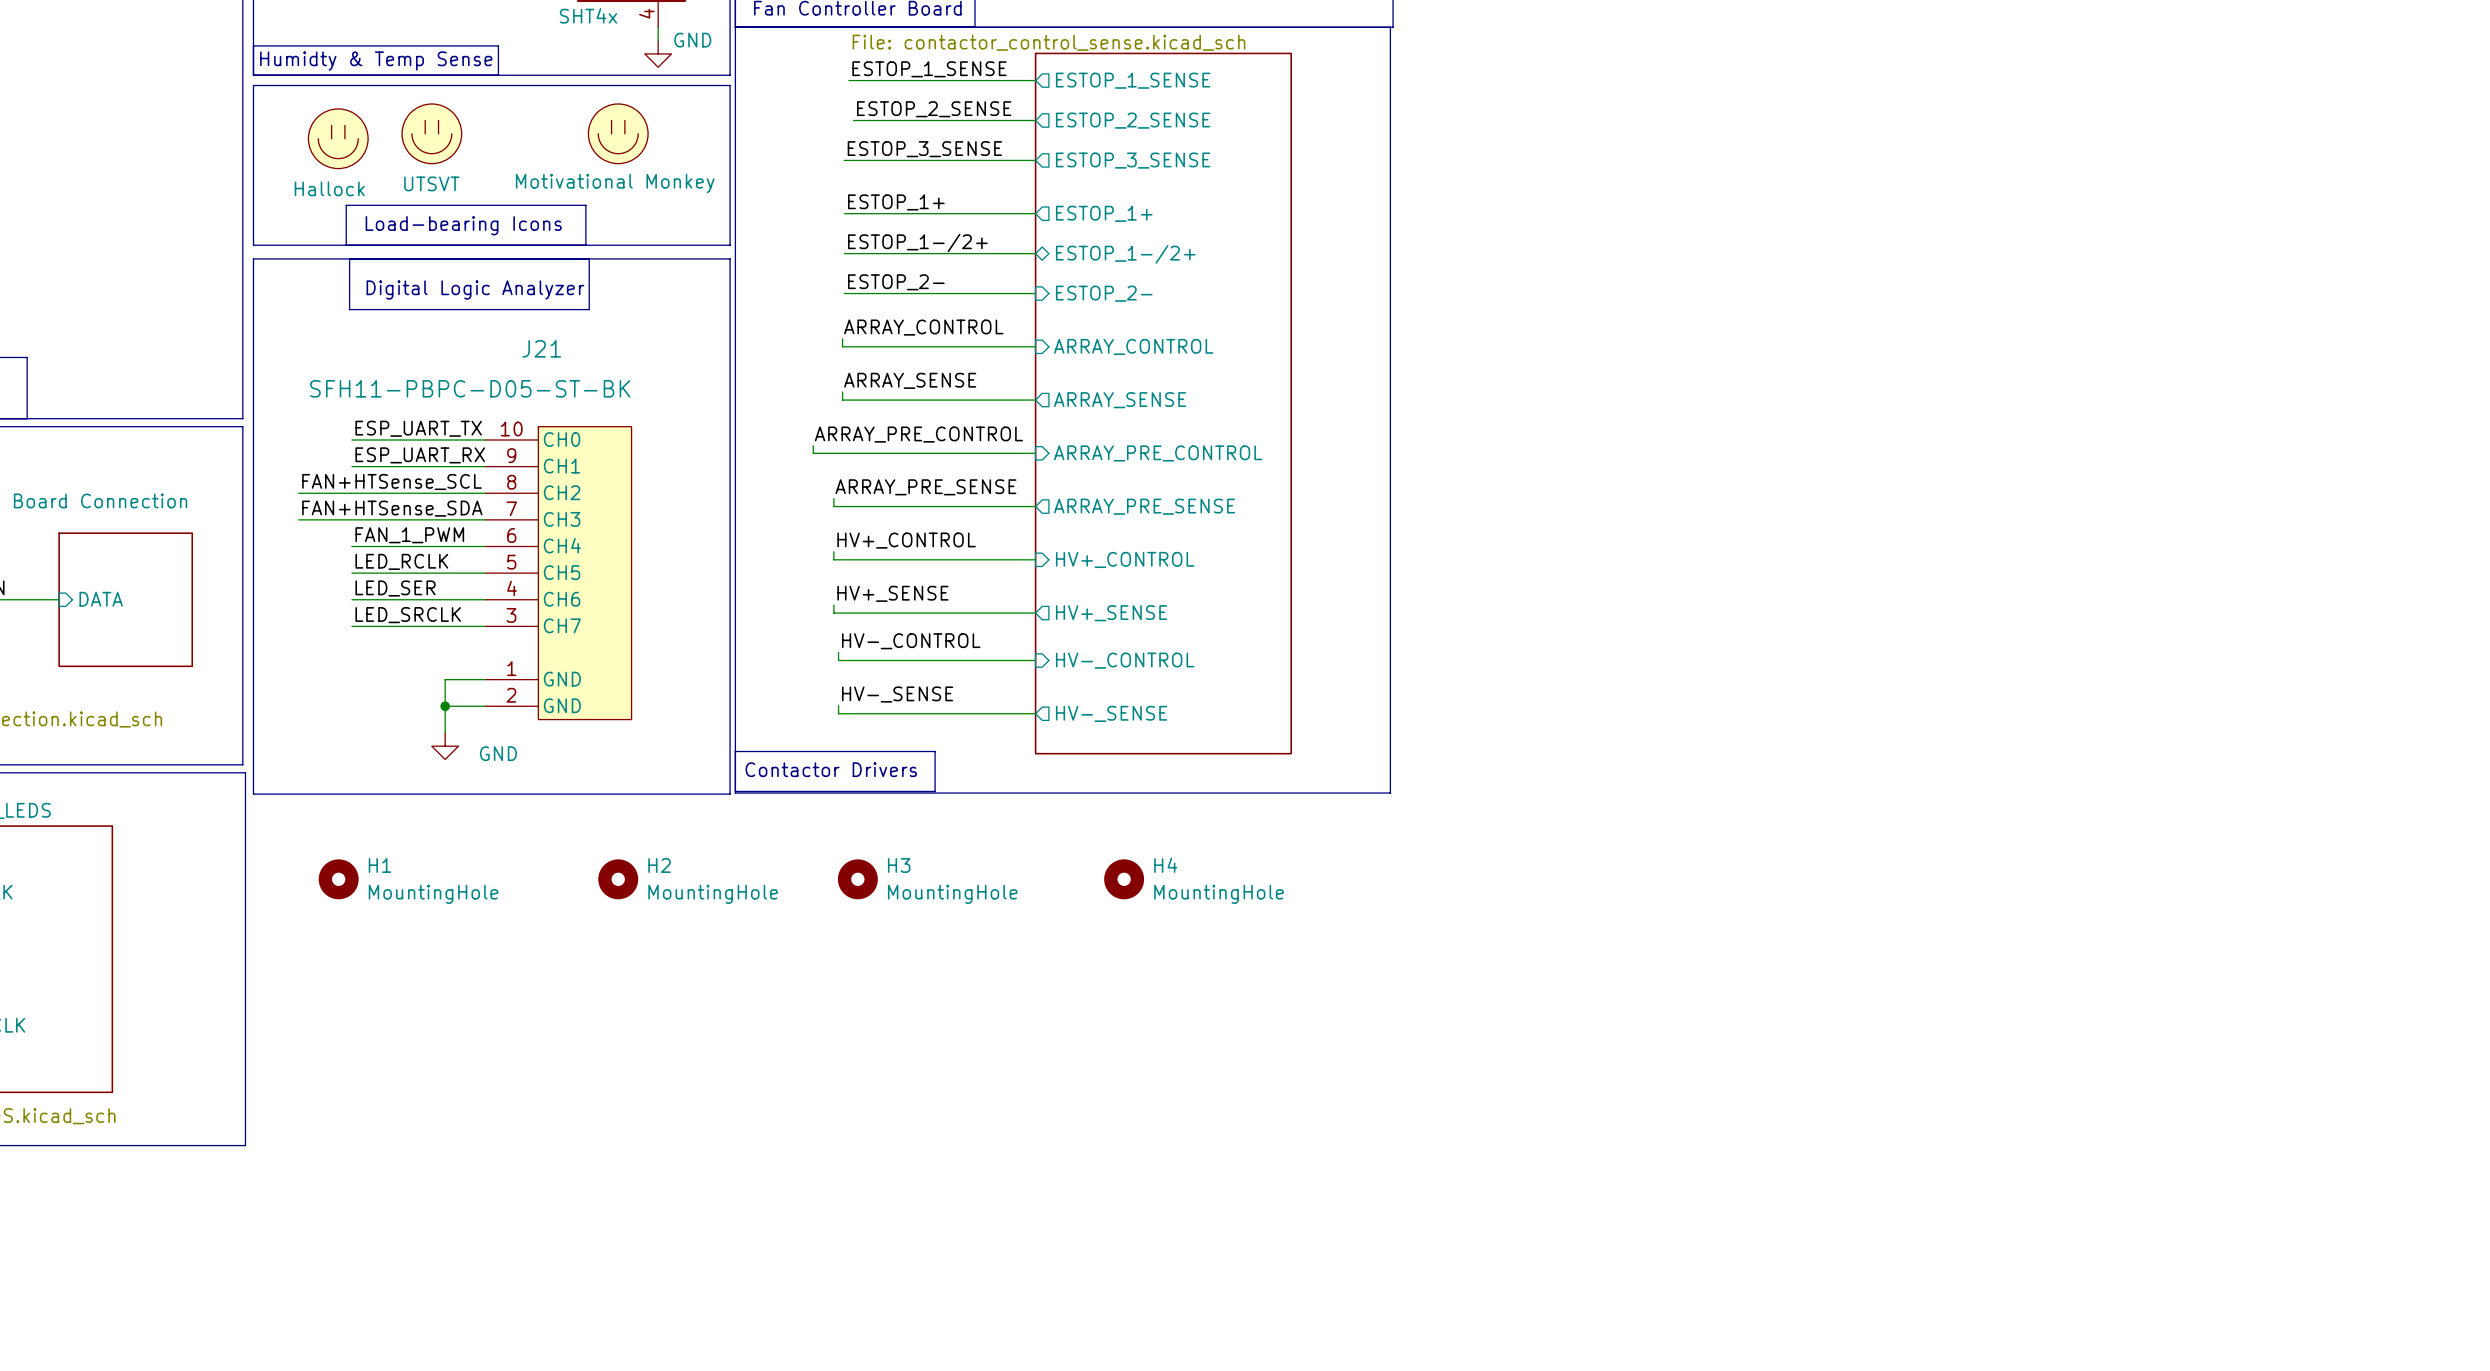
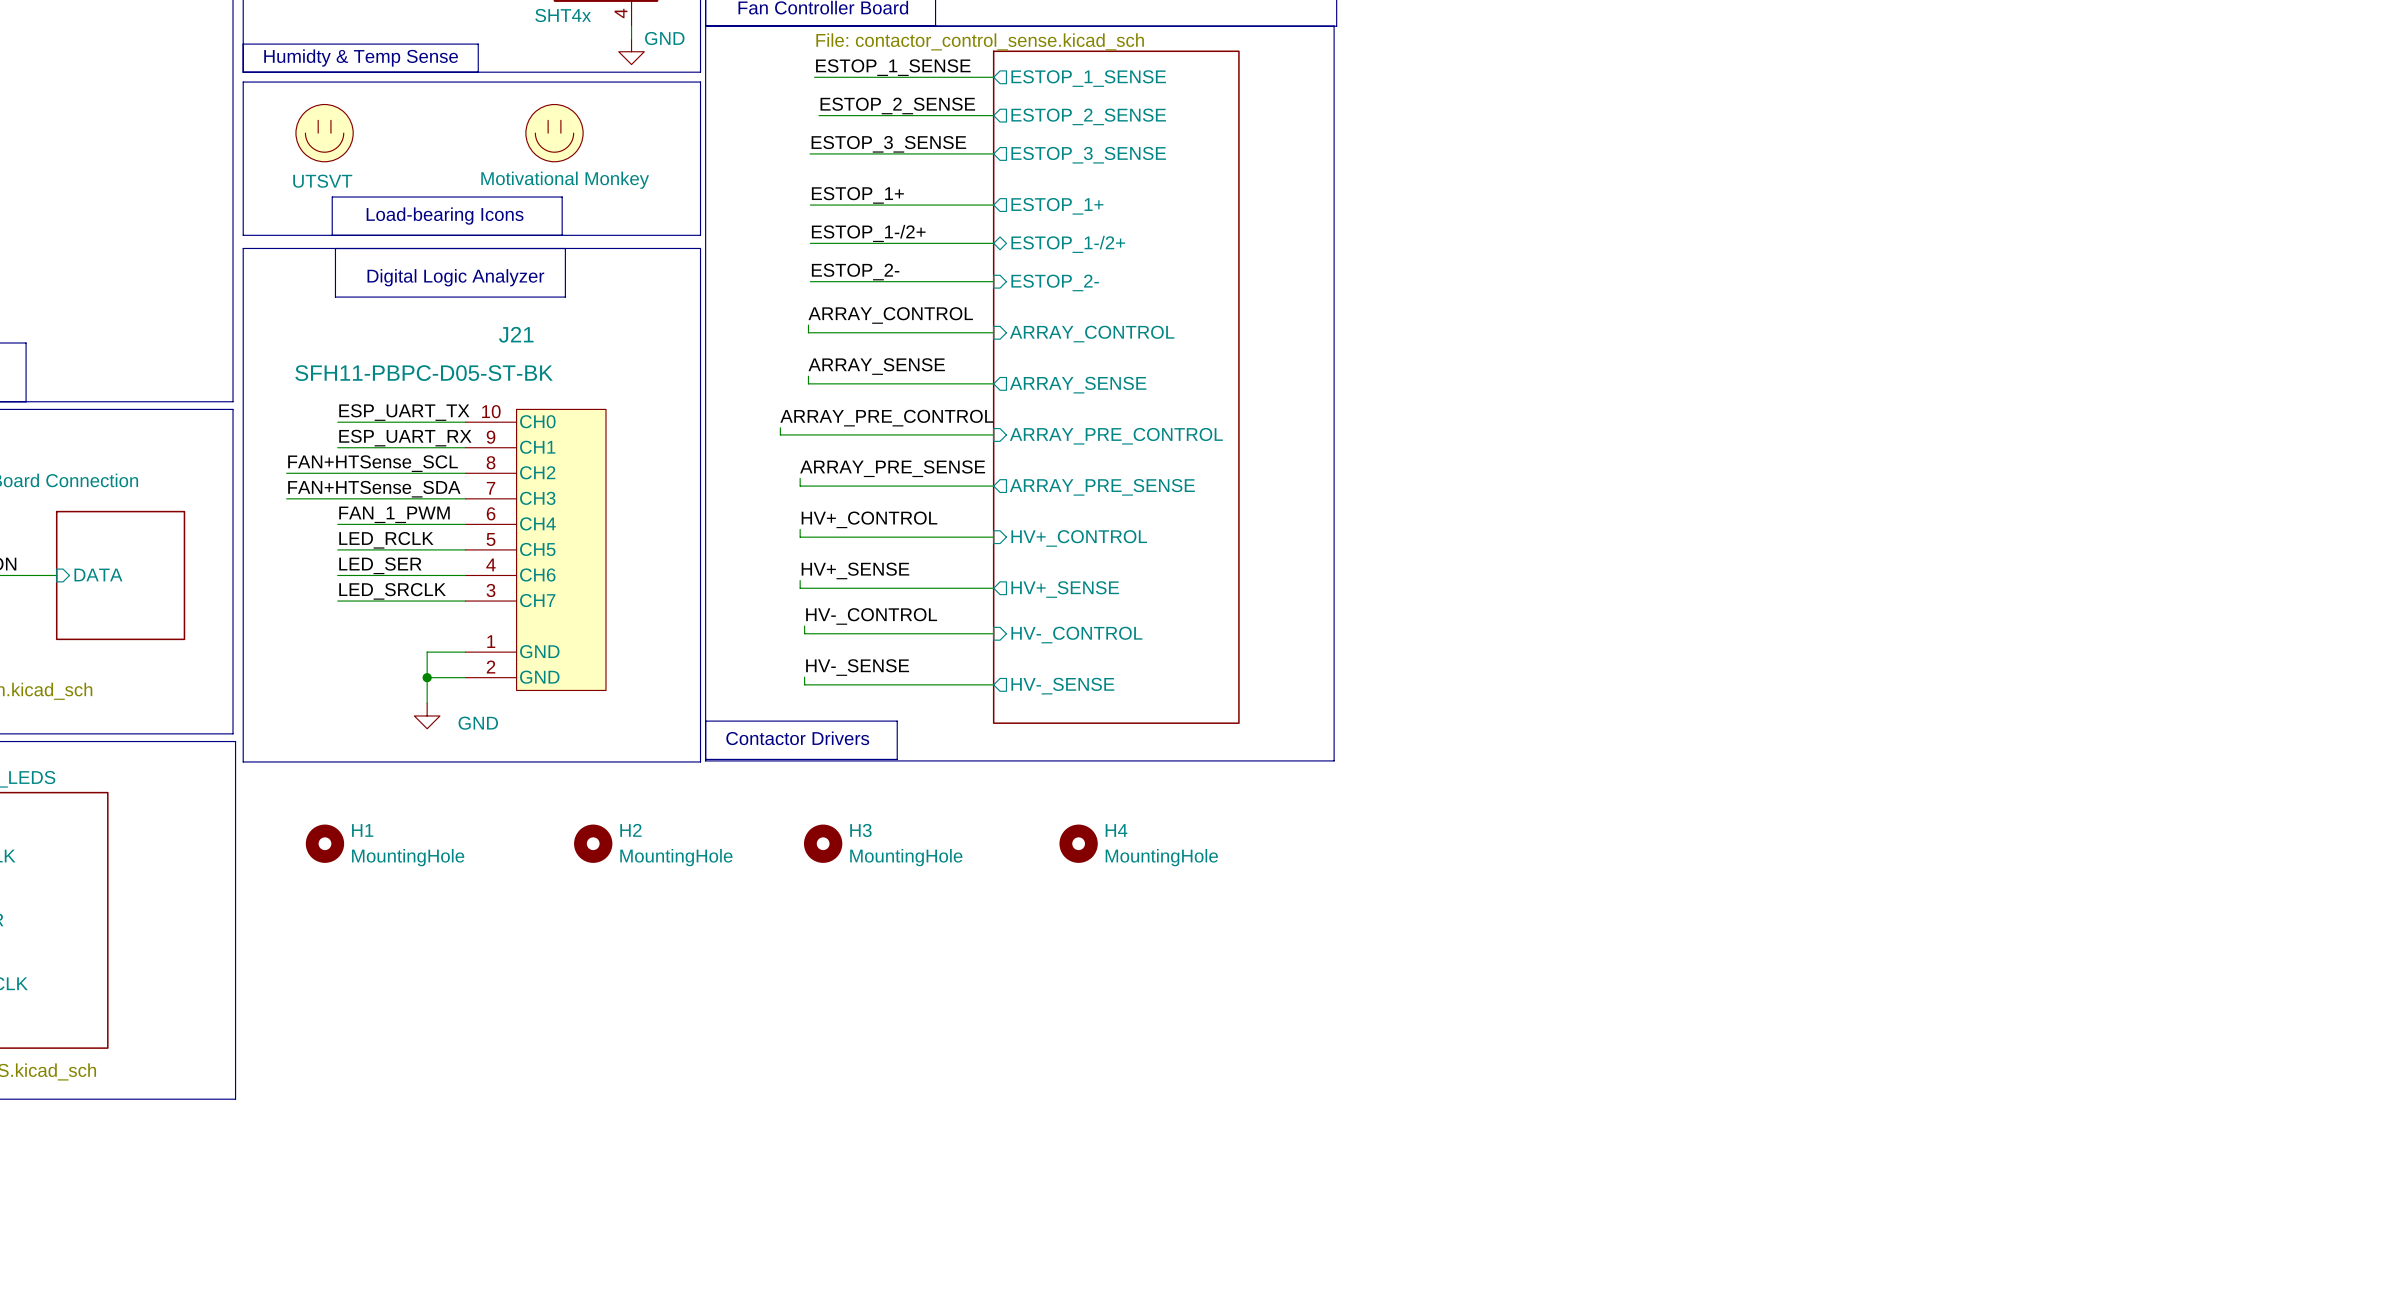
part: UTSVT (431, 133) -> none
part position: (618, 133) -> (554, 133)
part value: Hallock (329, 188) -> UTSVT (322, 181)

